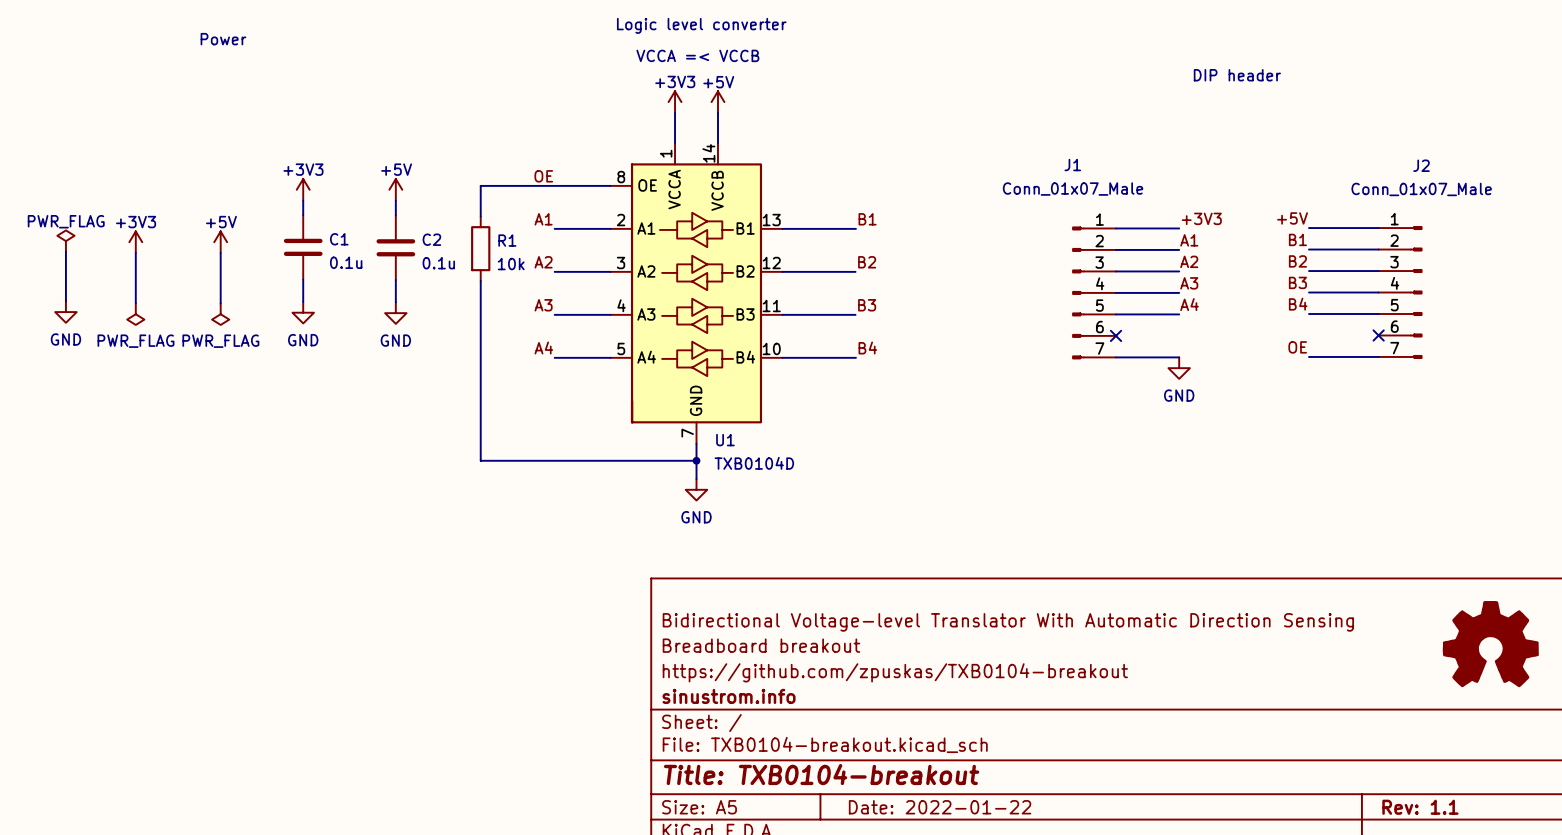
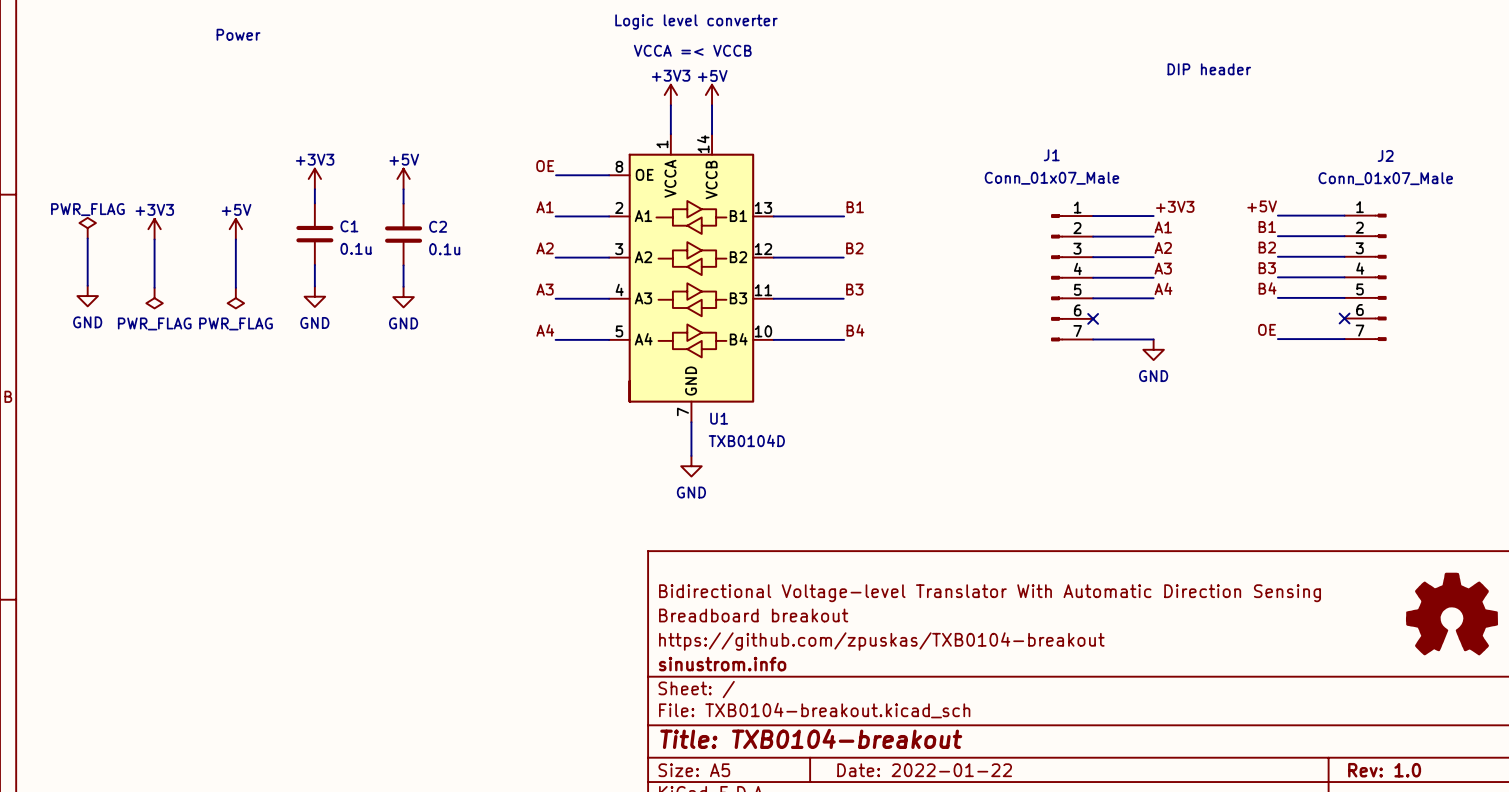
wire: (555, 185) (480, 185) (480, 216) -> none
R1: 10k (480, 248) -> none
wire: (480, 280) (480, 460) (696, 460) -> none
junction: (696, 460) -> none
title block: Rev: 1.1 (1420, 807) -> Rev: 1.0 (1384, 770)

